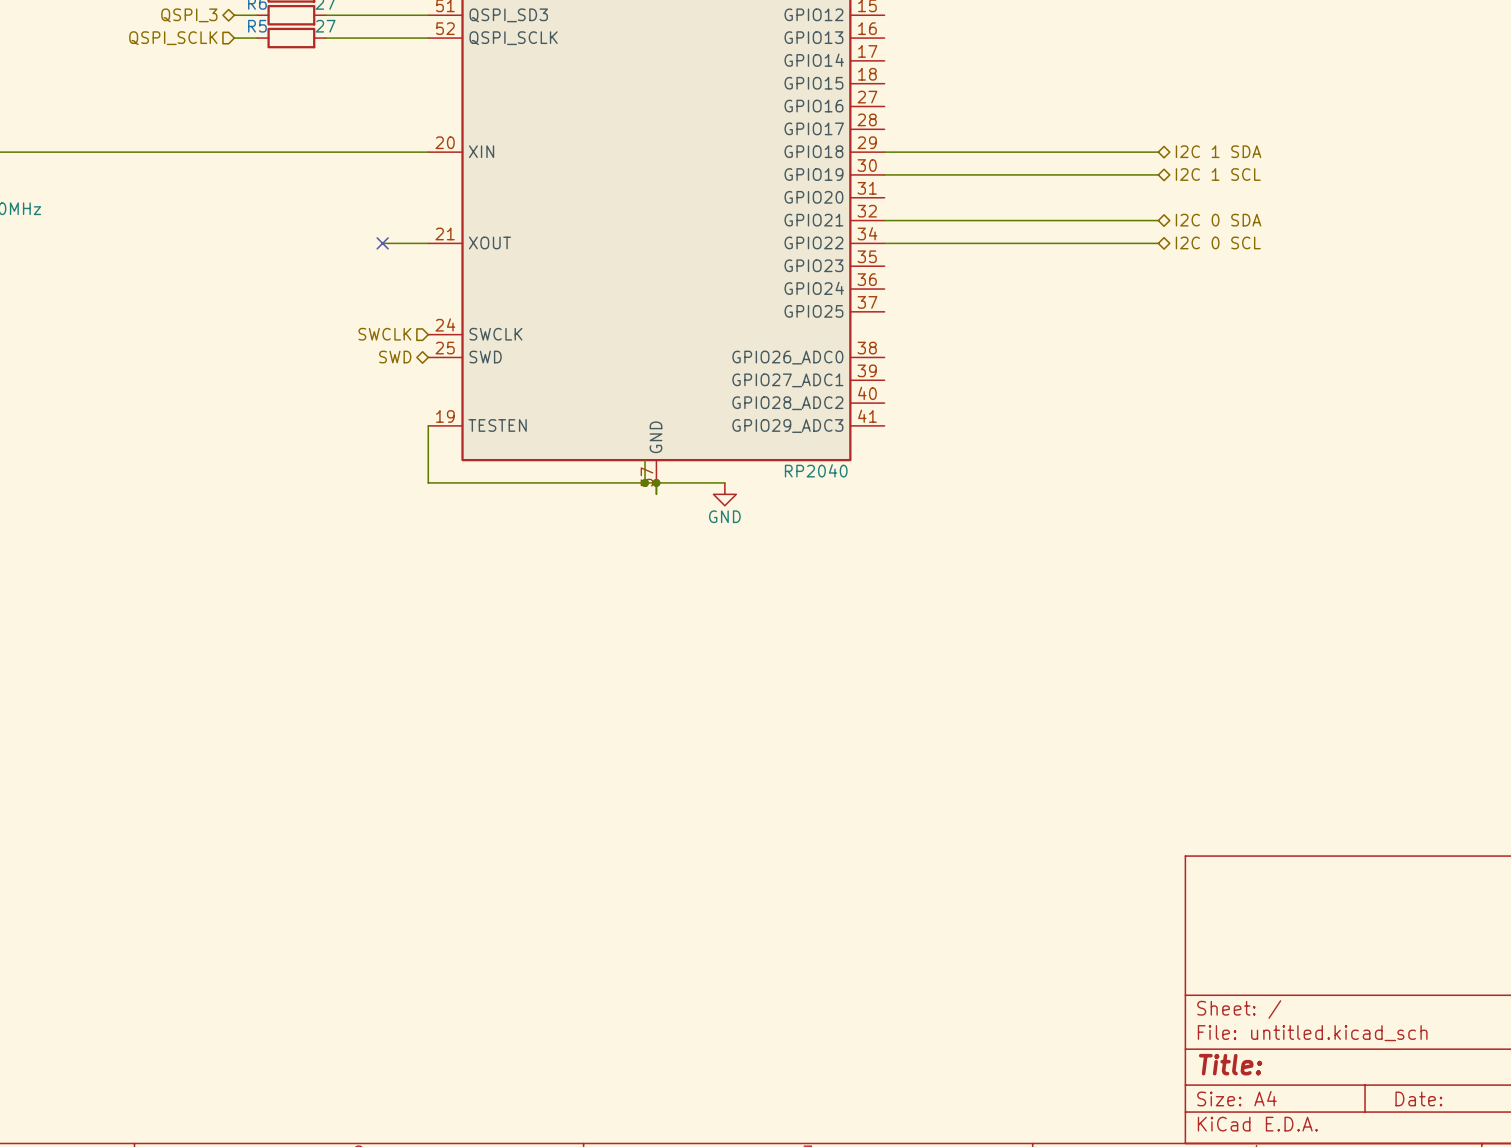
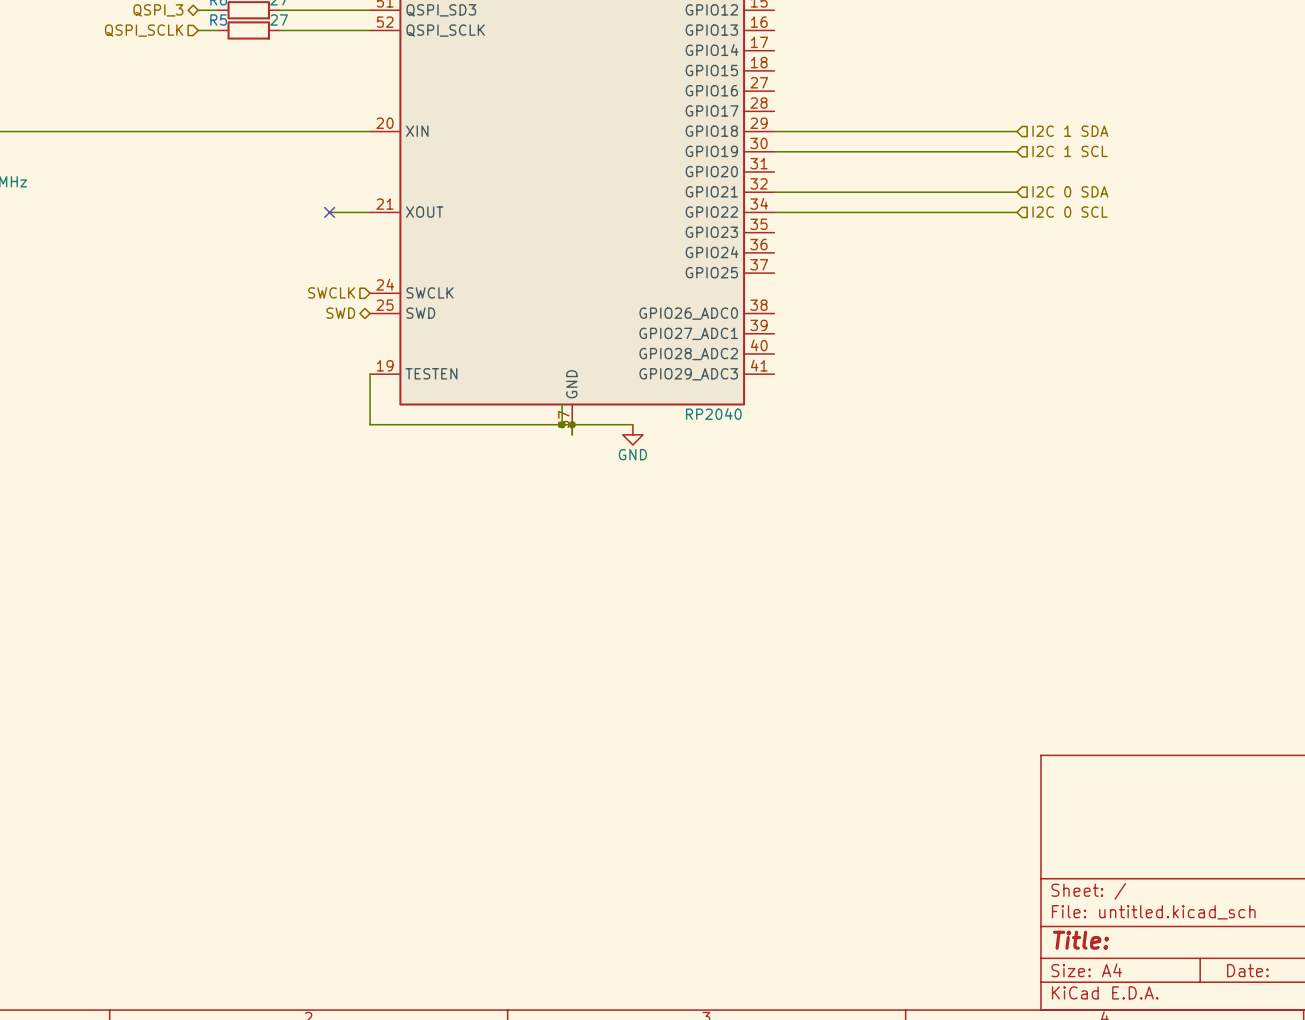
hierarchical label shape: bidirectional (1218, 151) -> input (1070, 131)
hierarchical label shape: bidirectional (1218, 174) -> input (1070, 151)
hierarchical label shape: bidirectional (1218, 220) -> input (1070, 191)
hierarchical label shape: bidirectional (1218, 242) -> input (1070, 212)

